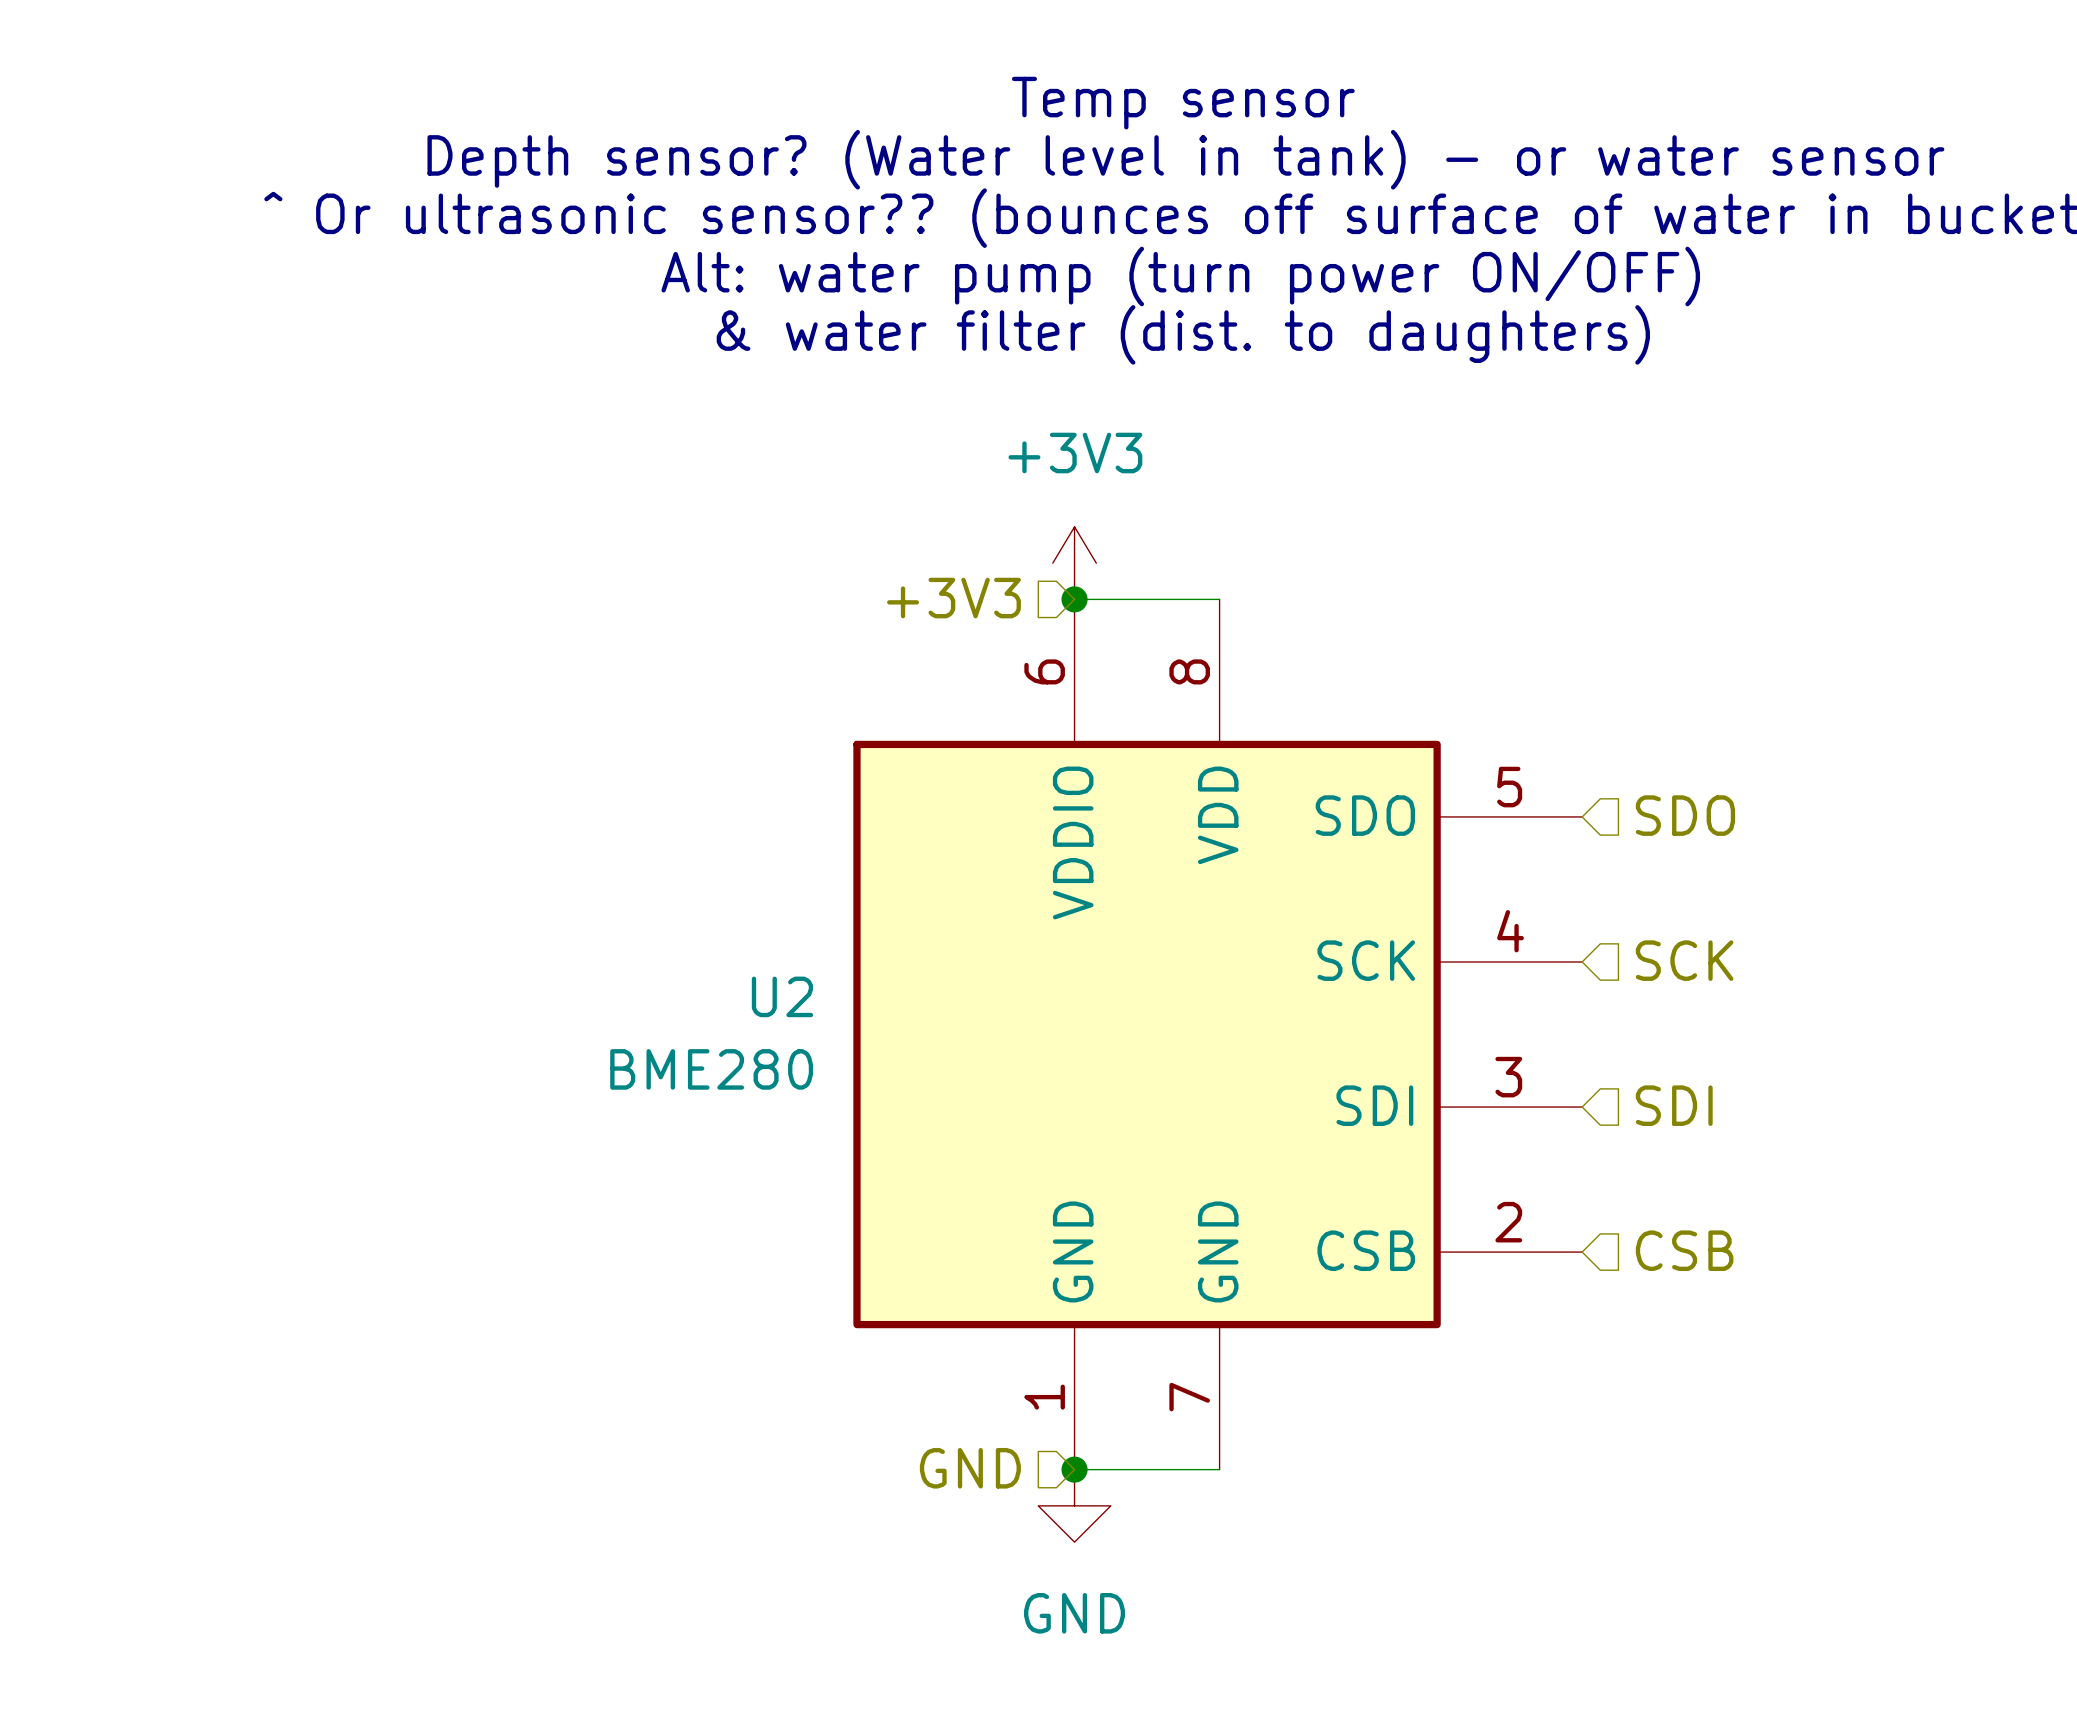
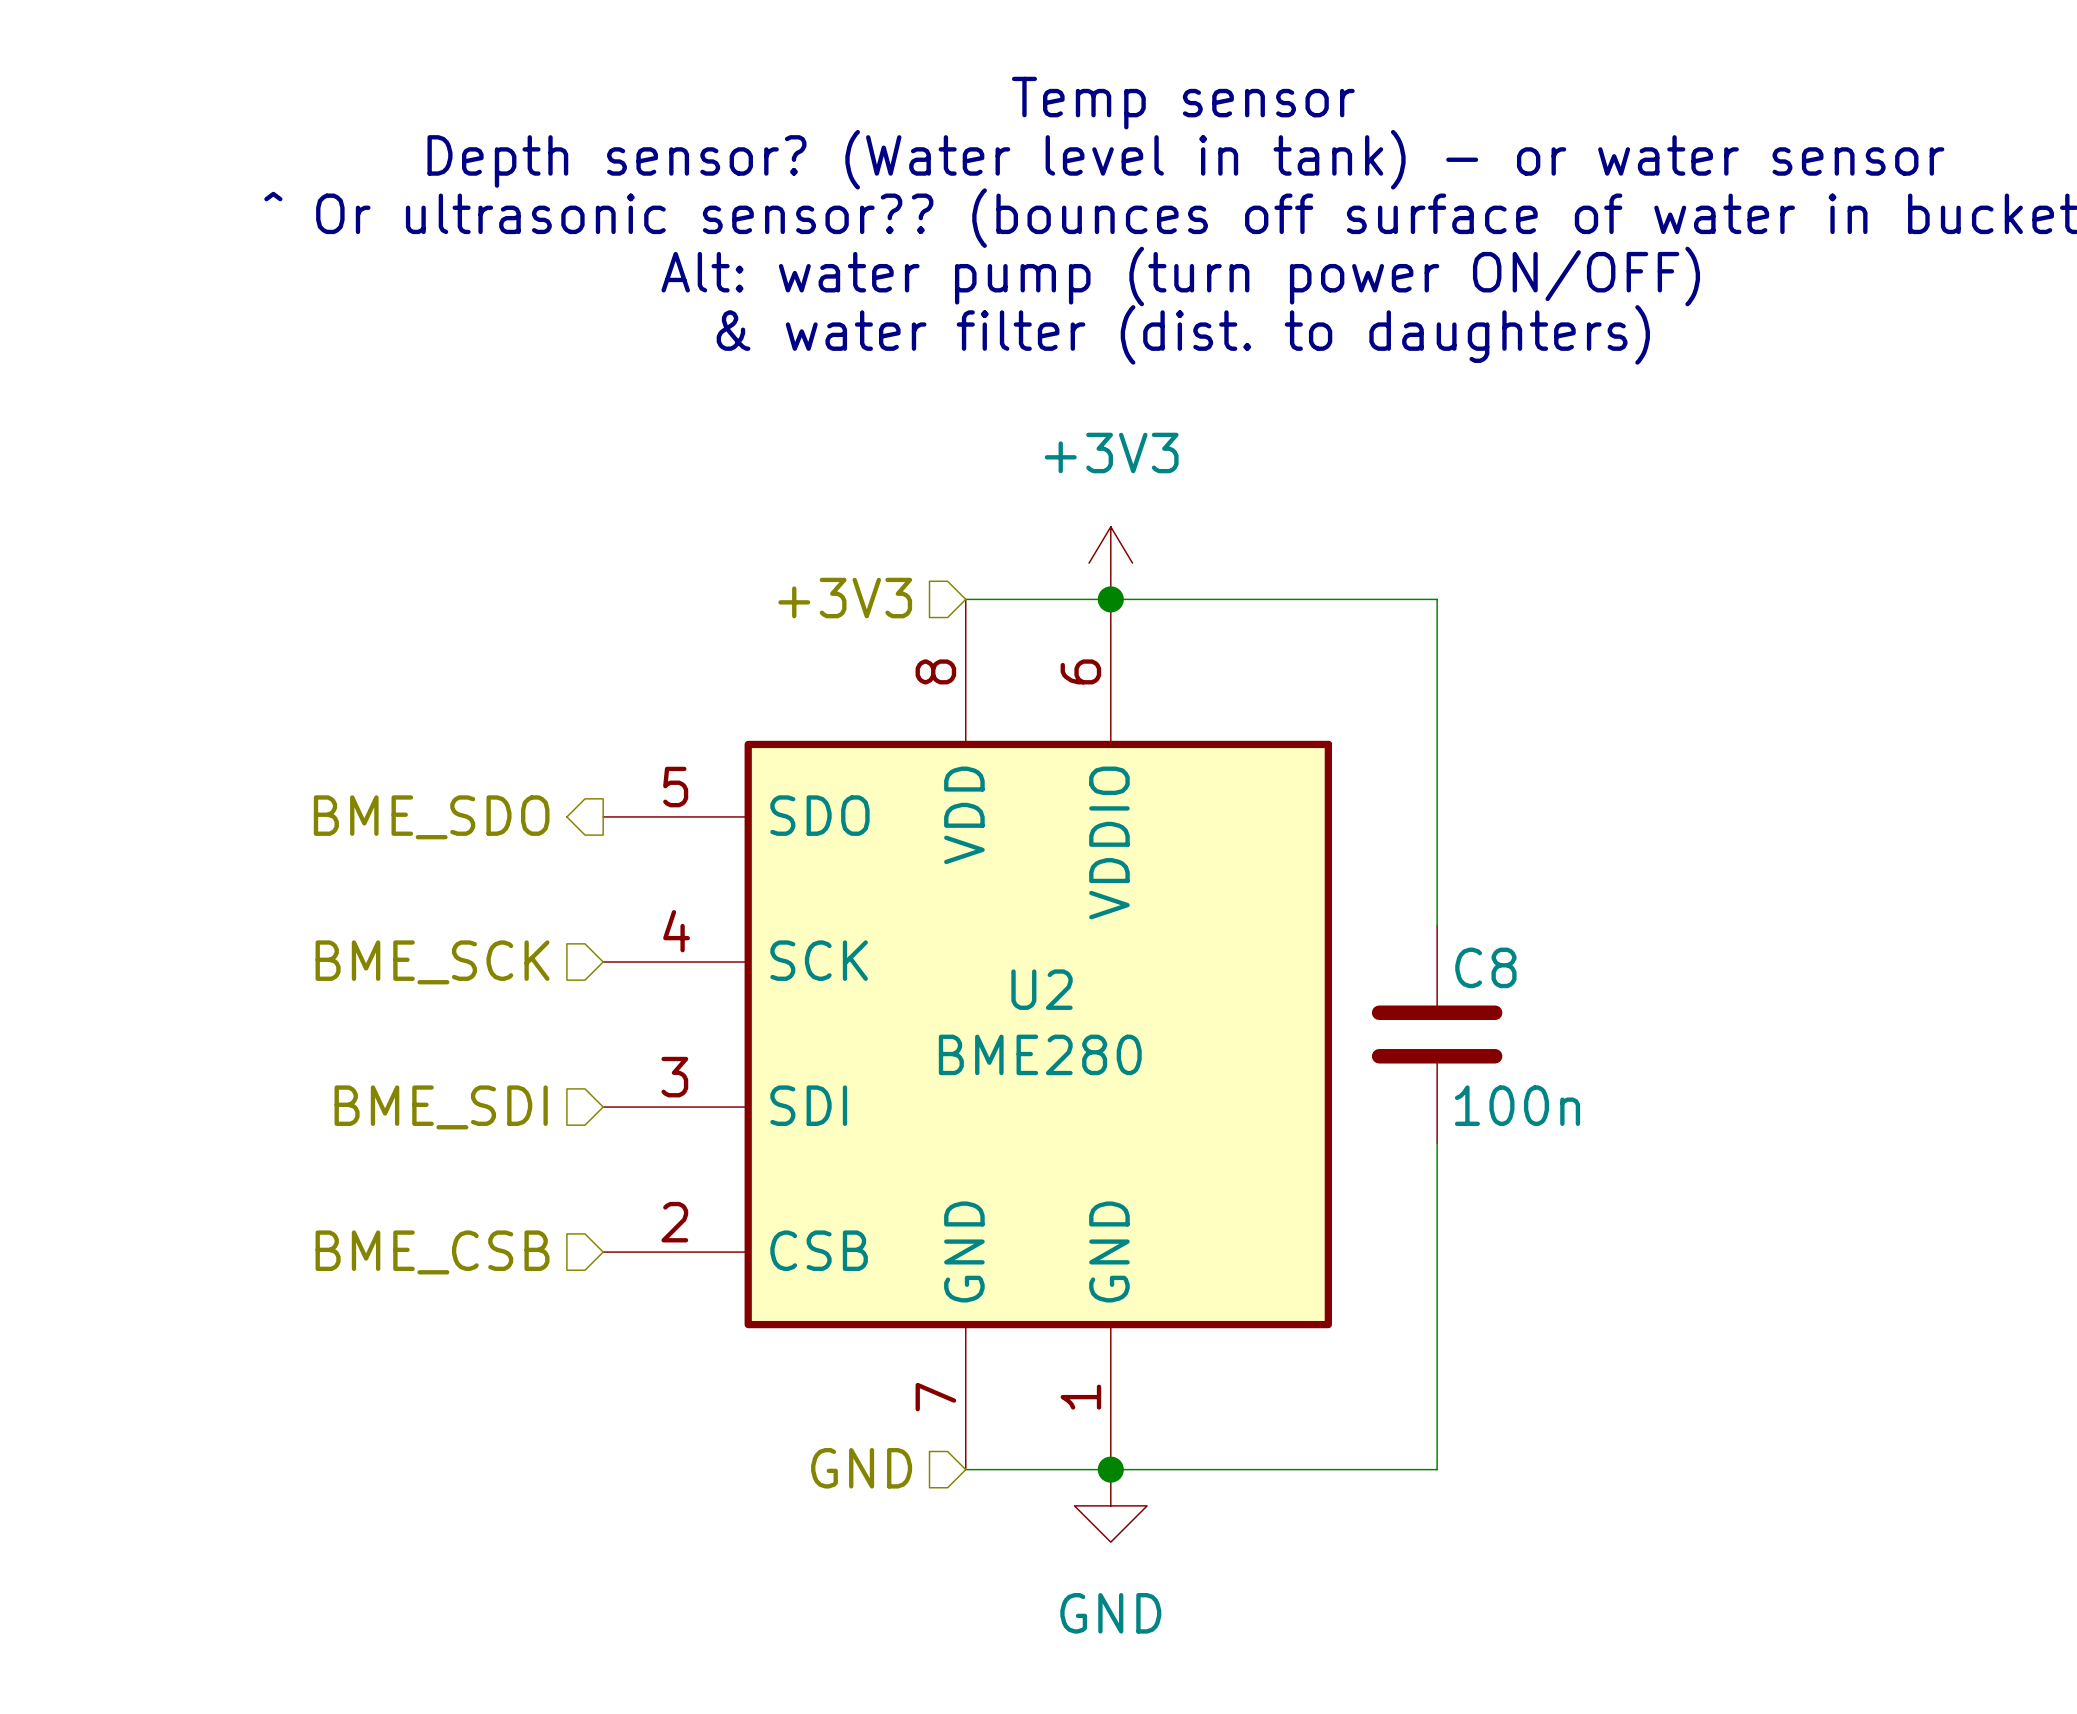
power symbol position: +3V3 (1074, 563) -> +3V3 (1110, 563)
hierarchical label position: +3V3 (953, 598) -> +3V3 (845, 598)
wire: none -> (965, 599) (1074, 599)
junction position: (1074, 599) -> (1110, 599)
wire: none -> (1219, 599) (1437, 599) (1437, 925)
hierarchical label: SDO (1685, 815) -> none
hierarchical label: none -> BME_SDO (431, 817)
hierarchical label: SCK (1684, 960) -> none
hierarchical label: none -> BME_SCK (432, 962)
U2 name position: U2 (782, 996) -> U2 (1042, 989)
U2 flip: as is (1147, 1034) -> left-right (1038, 1034)
C8: none -> 100n (1437, 1034)
U2 value position: BME280 (711, 1069) -> BME280 (1040, 1054)
hierarchical label: SDI (1674, 1105) -> none
hierarchical label: none -> BME_SDI (441, 1107)
wire: none -> (1437, 1143) (1437, 1469) (1219, 1469)
hierarchical label: CSB (1684, 1250) -> none
hierarchical label: none -> BME_CSB (432, 1252)
hierarchical label position: GND (970, 1468) -> GND (861, 1468)
wire: none -> (965, 1469) (1074, 1469)
junction position: (1074, 1469) -> (1110, 1469)
power symbol position: GND (1074, 1505) -> GND (1110, 1505)

